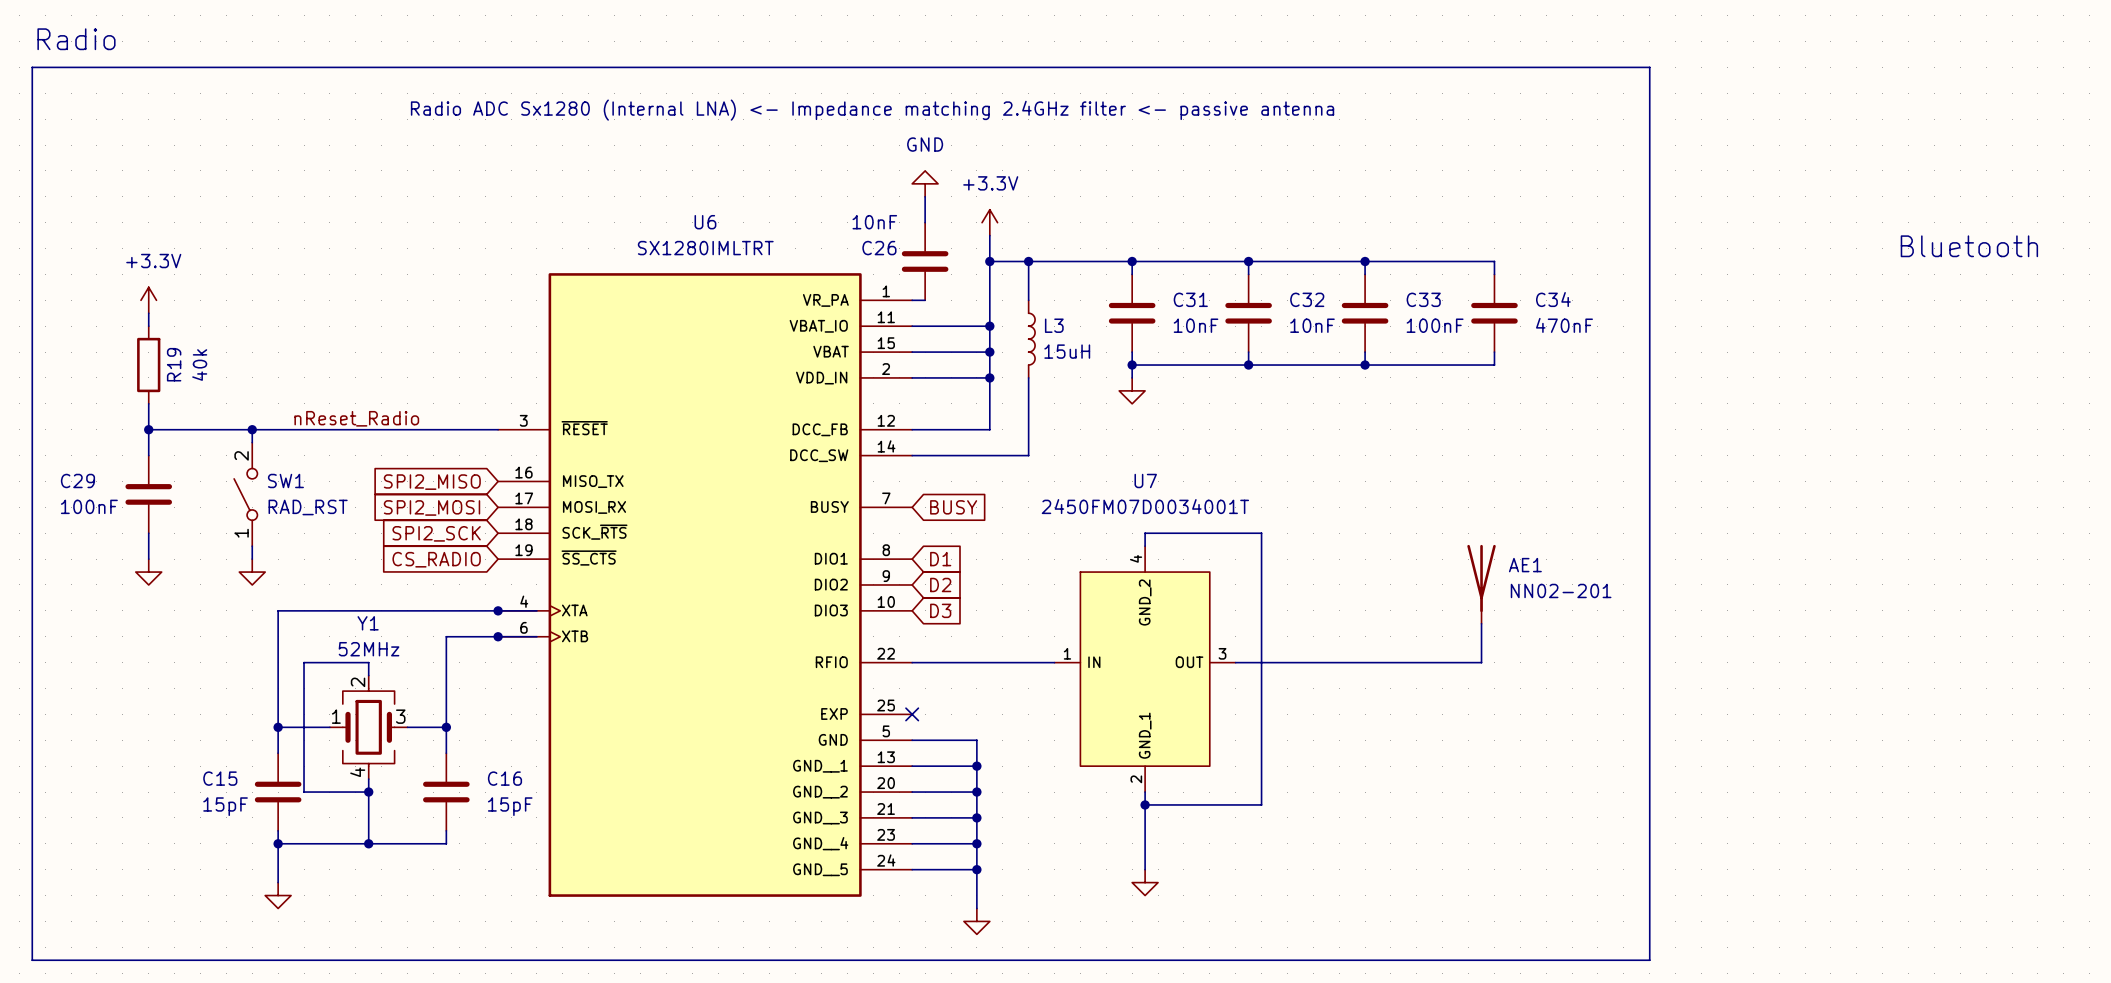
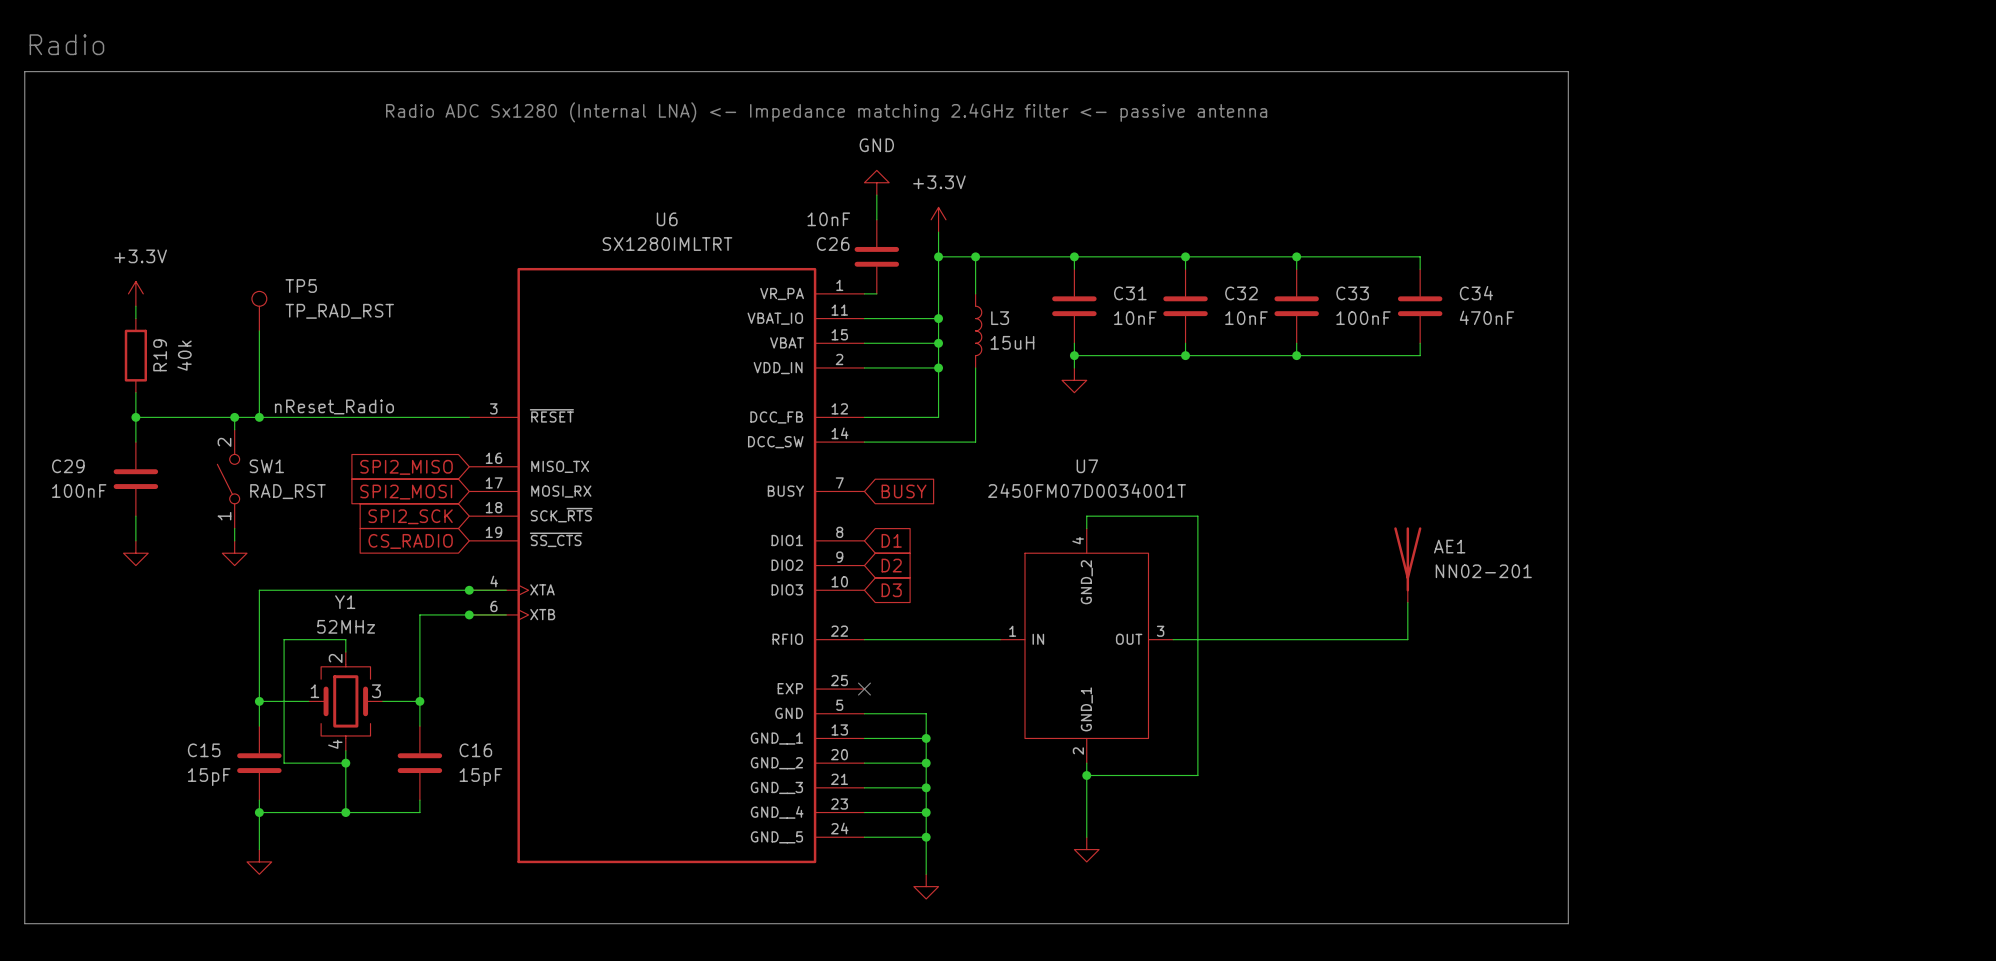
text: Bluetooth (1969, 246) -> none
TP5: none -> TP_RAD_RST (259, 311)
wire: none -> (259, 330) (259, 417)
junction: none -> (259, 417)

